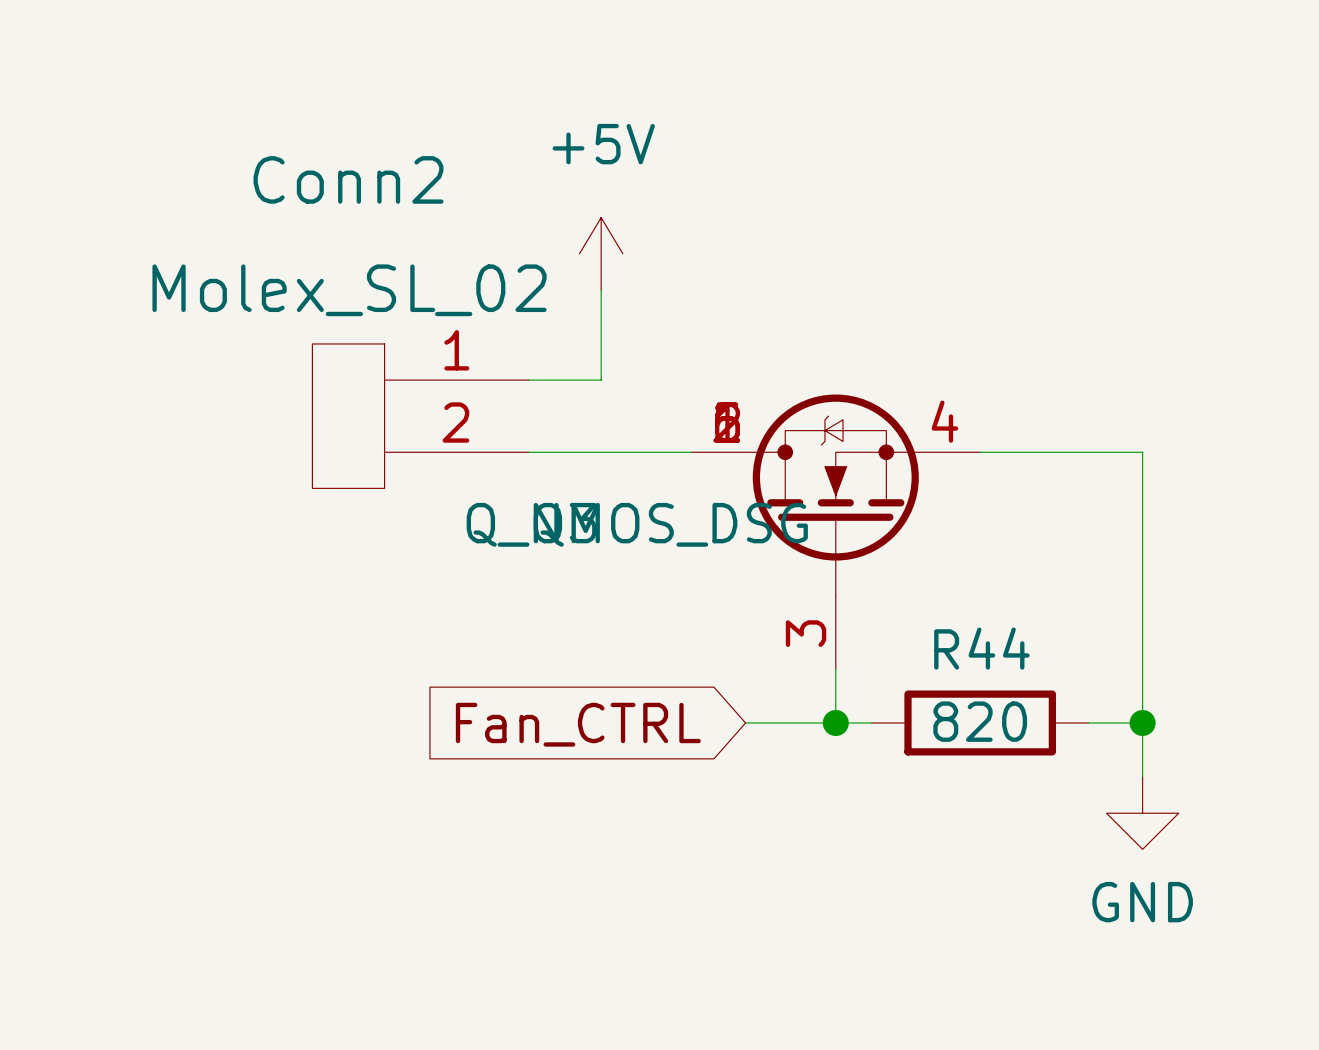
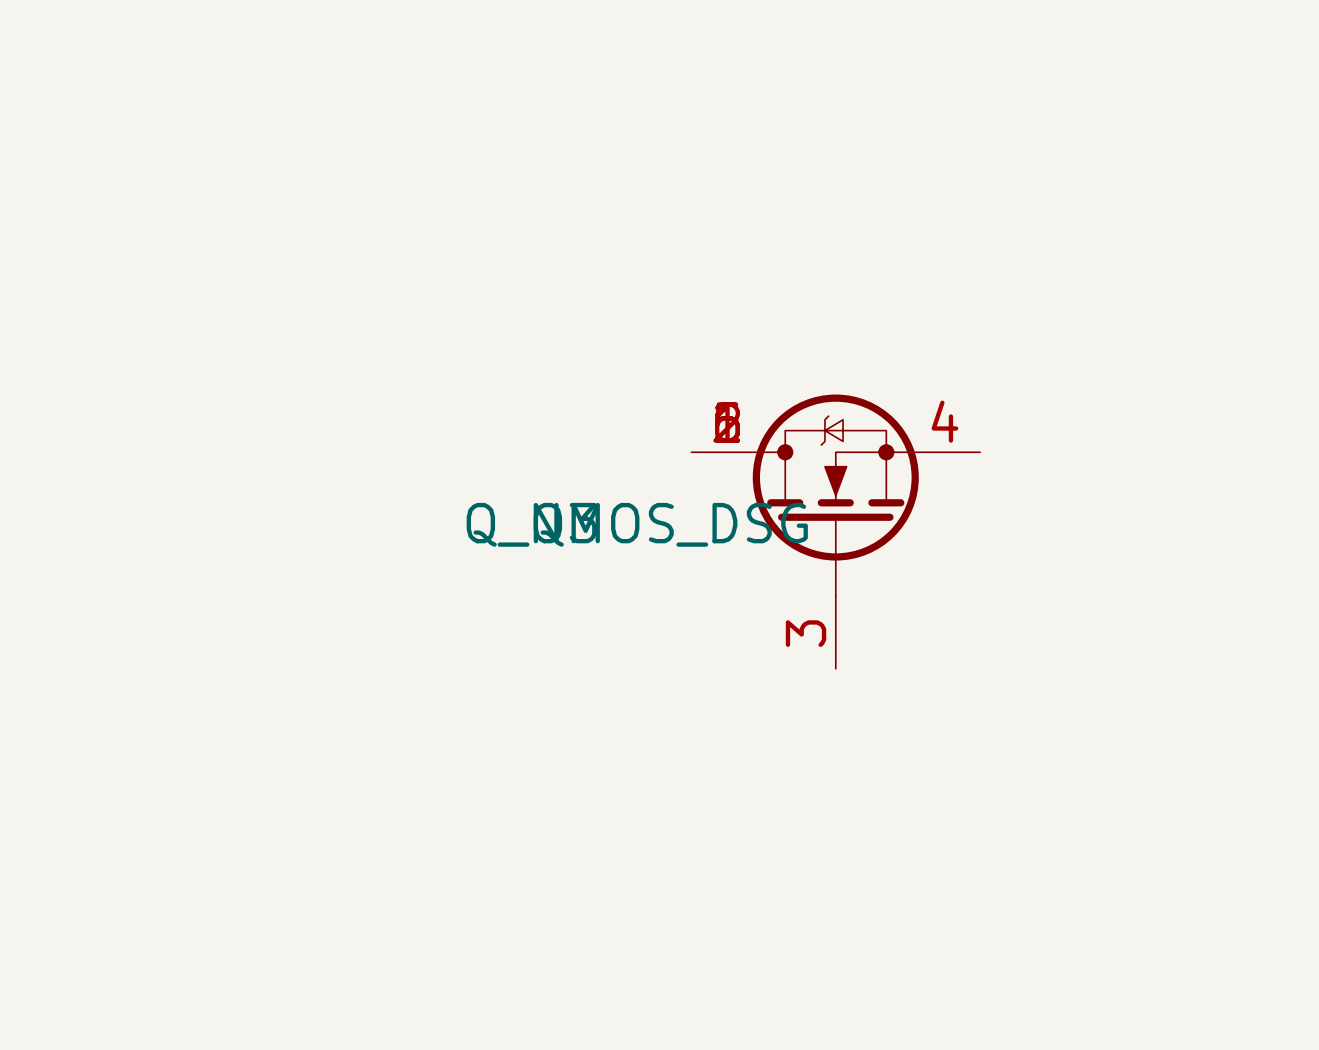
power symbol: +5V (601, 253) -> none
wire: (601, 289) (601, 380) (528, 380) -> none
Conn2: Molex_SL_02 (420, 416) -> none
wire: (528, 452) (691, 452) -> none
wire: (980, 452) (1142, 452) (1142, 777) -> none
wire: (835, 668) (835, 722) -> none
wire: (745, 722) (871, 722) -> none
junction: (835, 722) -> none
R44: 820 (980, 722) -> none
wire: (1088, 722) (1142, 722) -> none
junction: (1142, 722) -> none
global label: Fan_CTRL (578, 724) -> none
power symbol: GND (1142, 813) -> none

